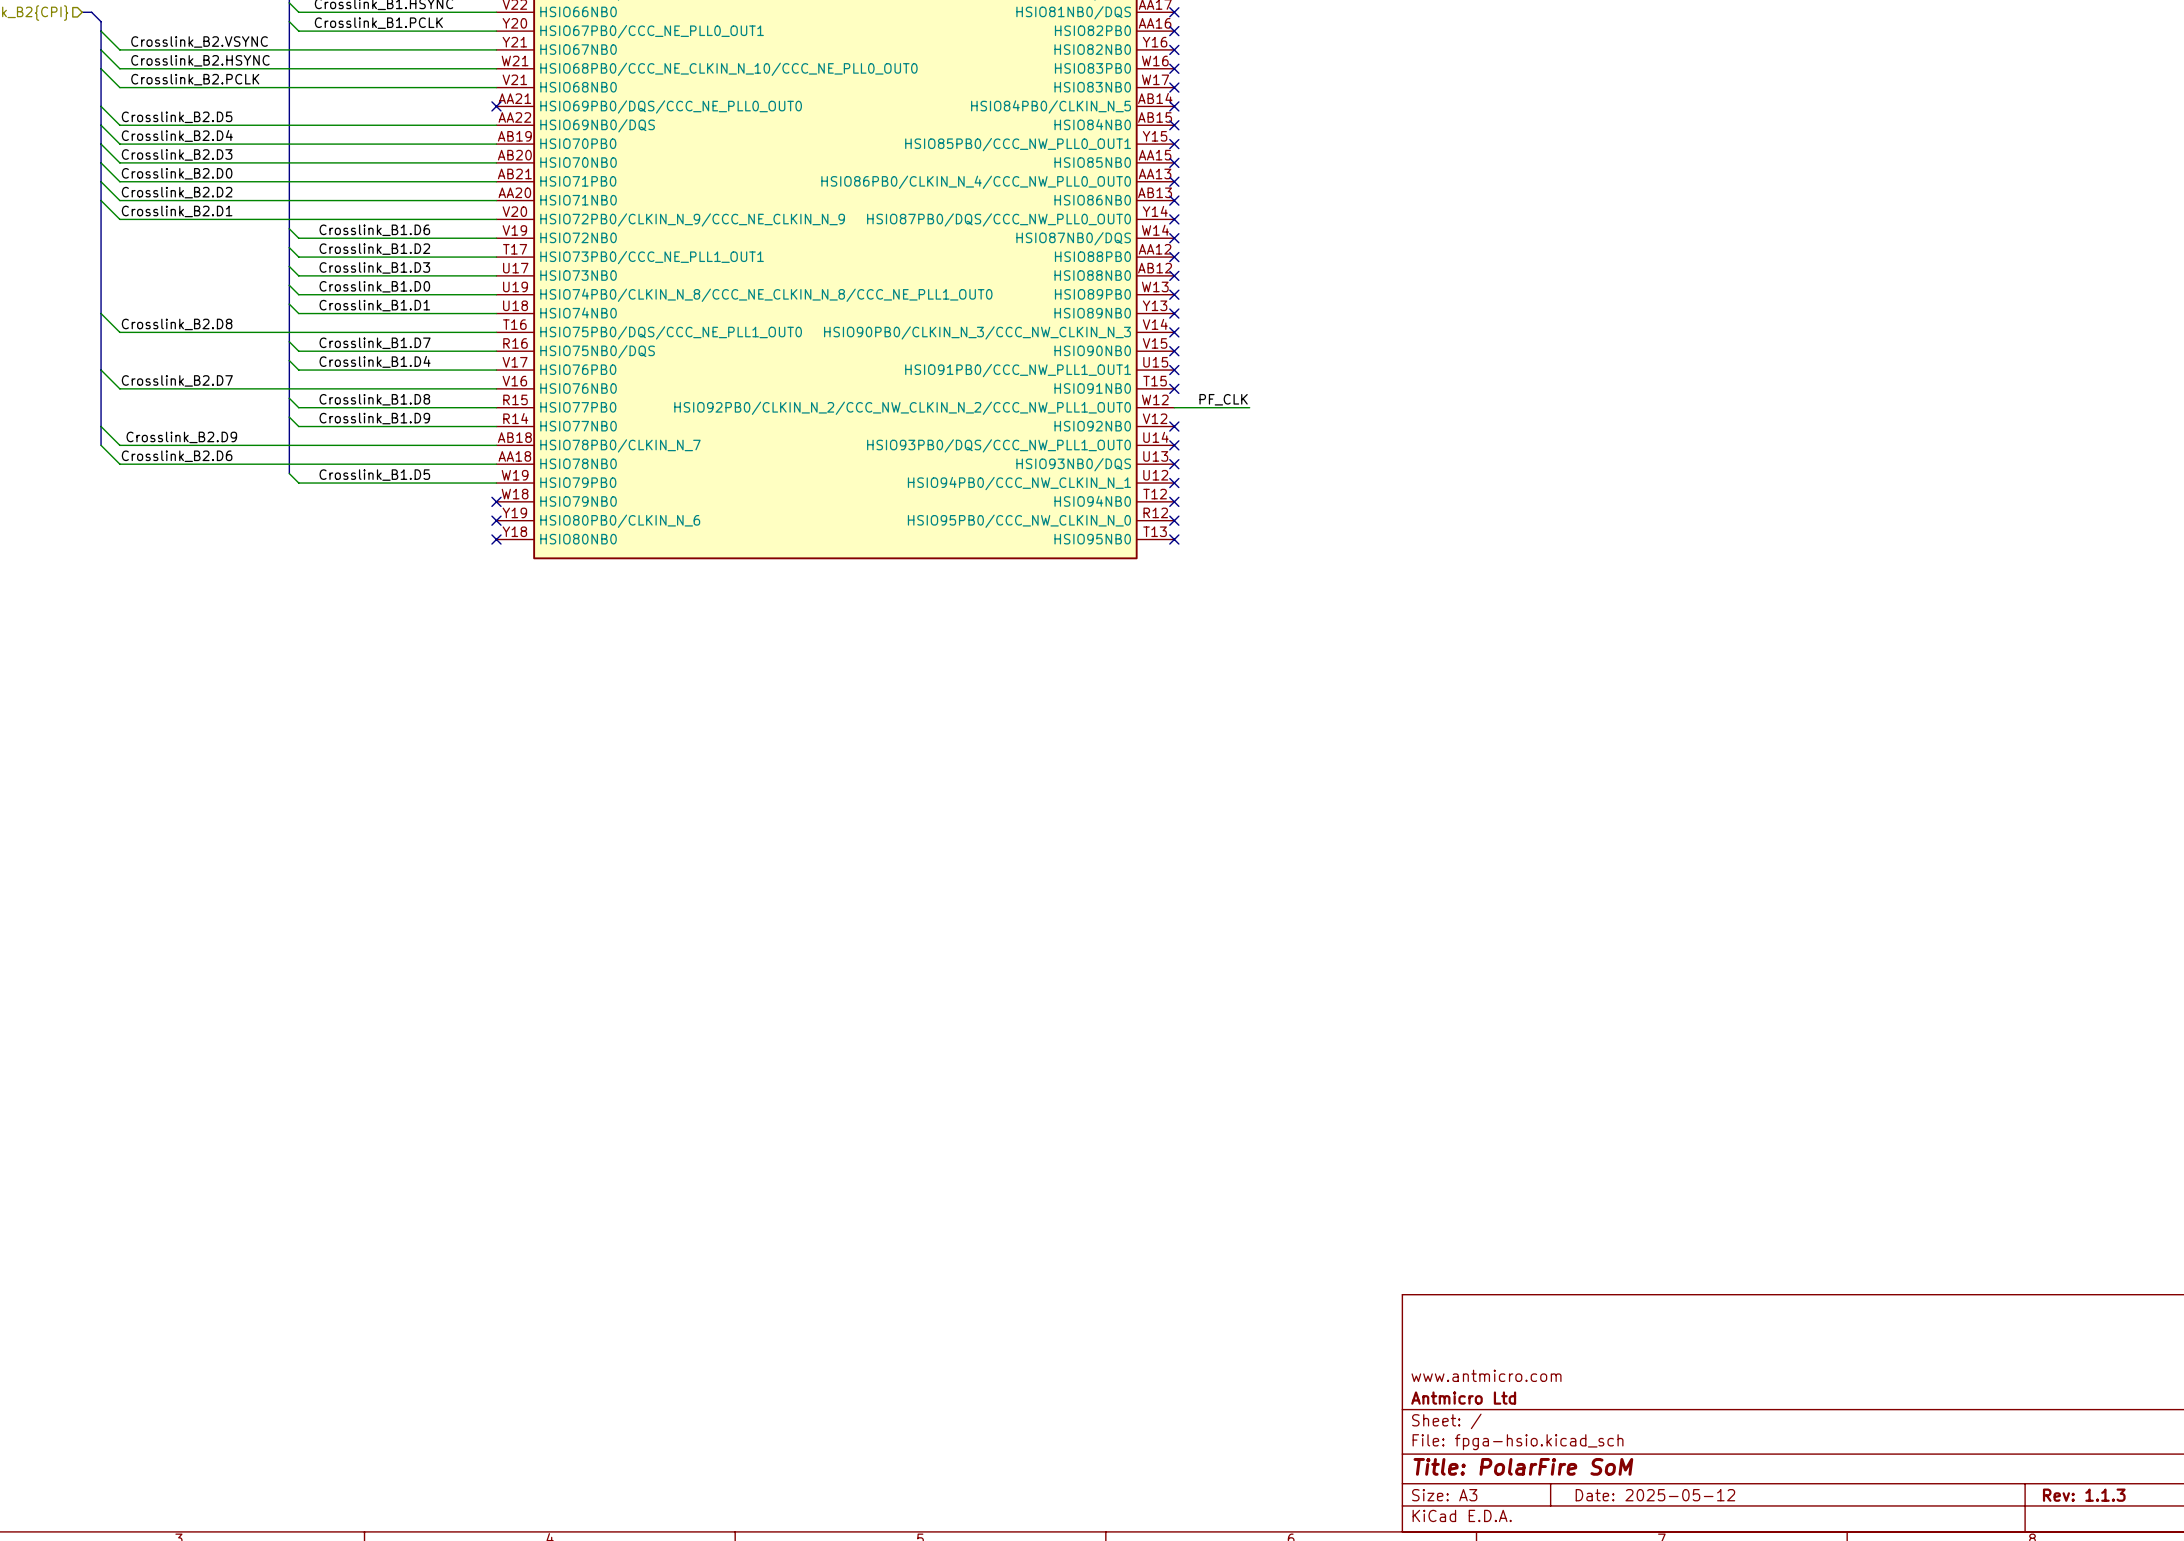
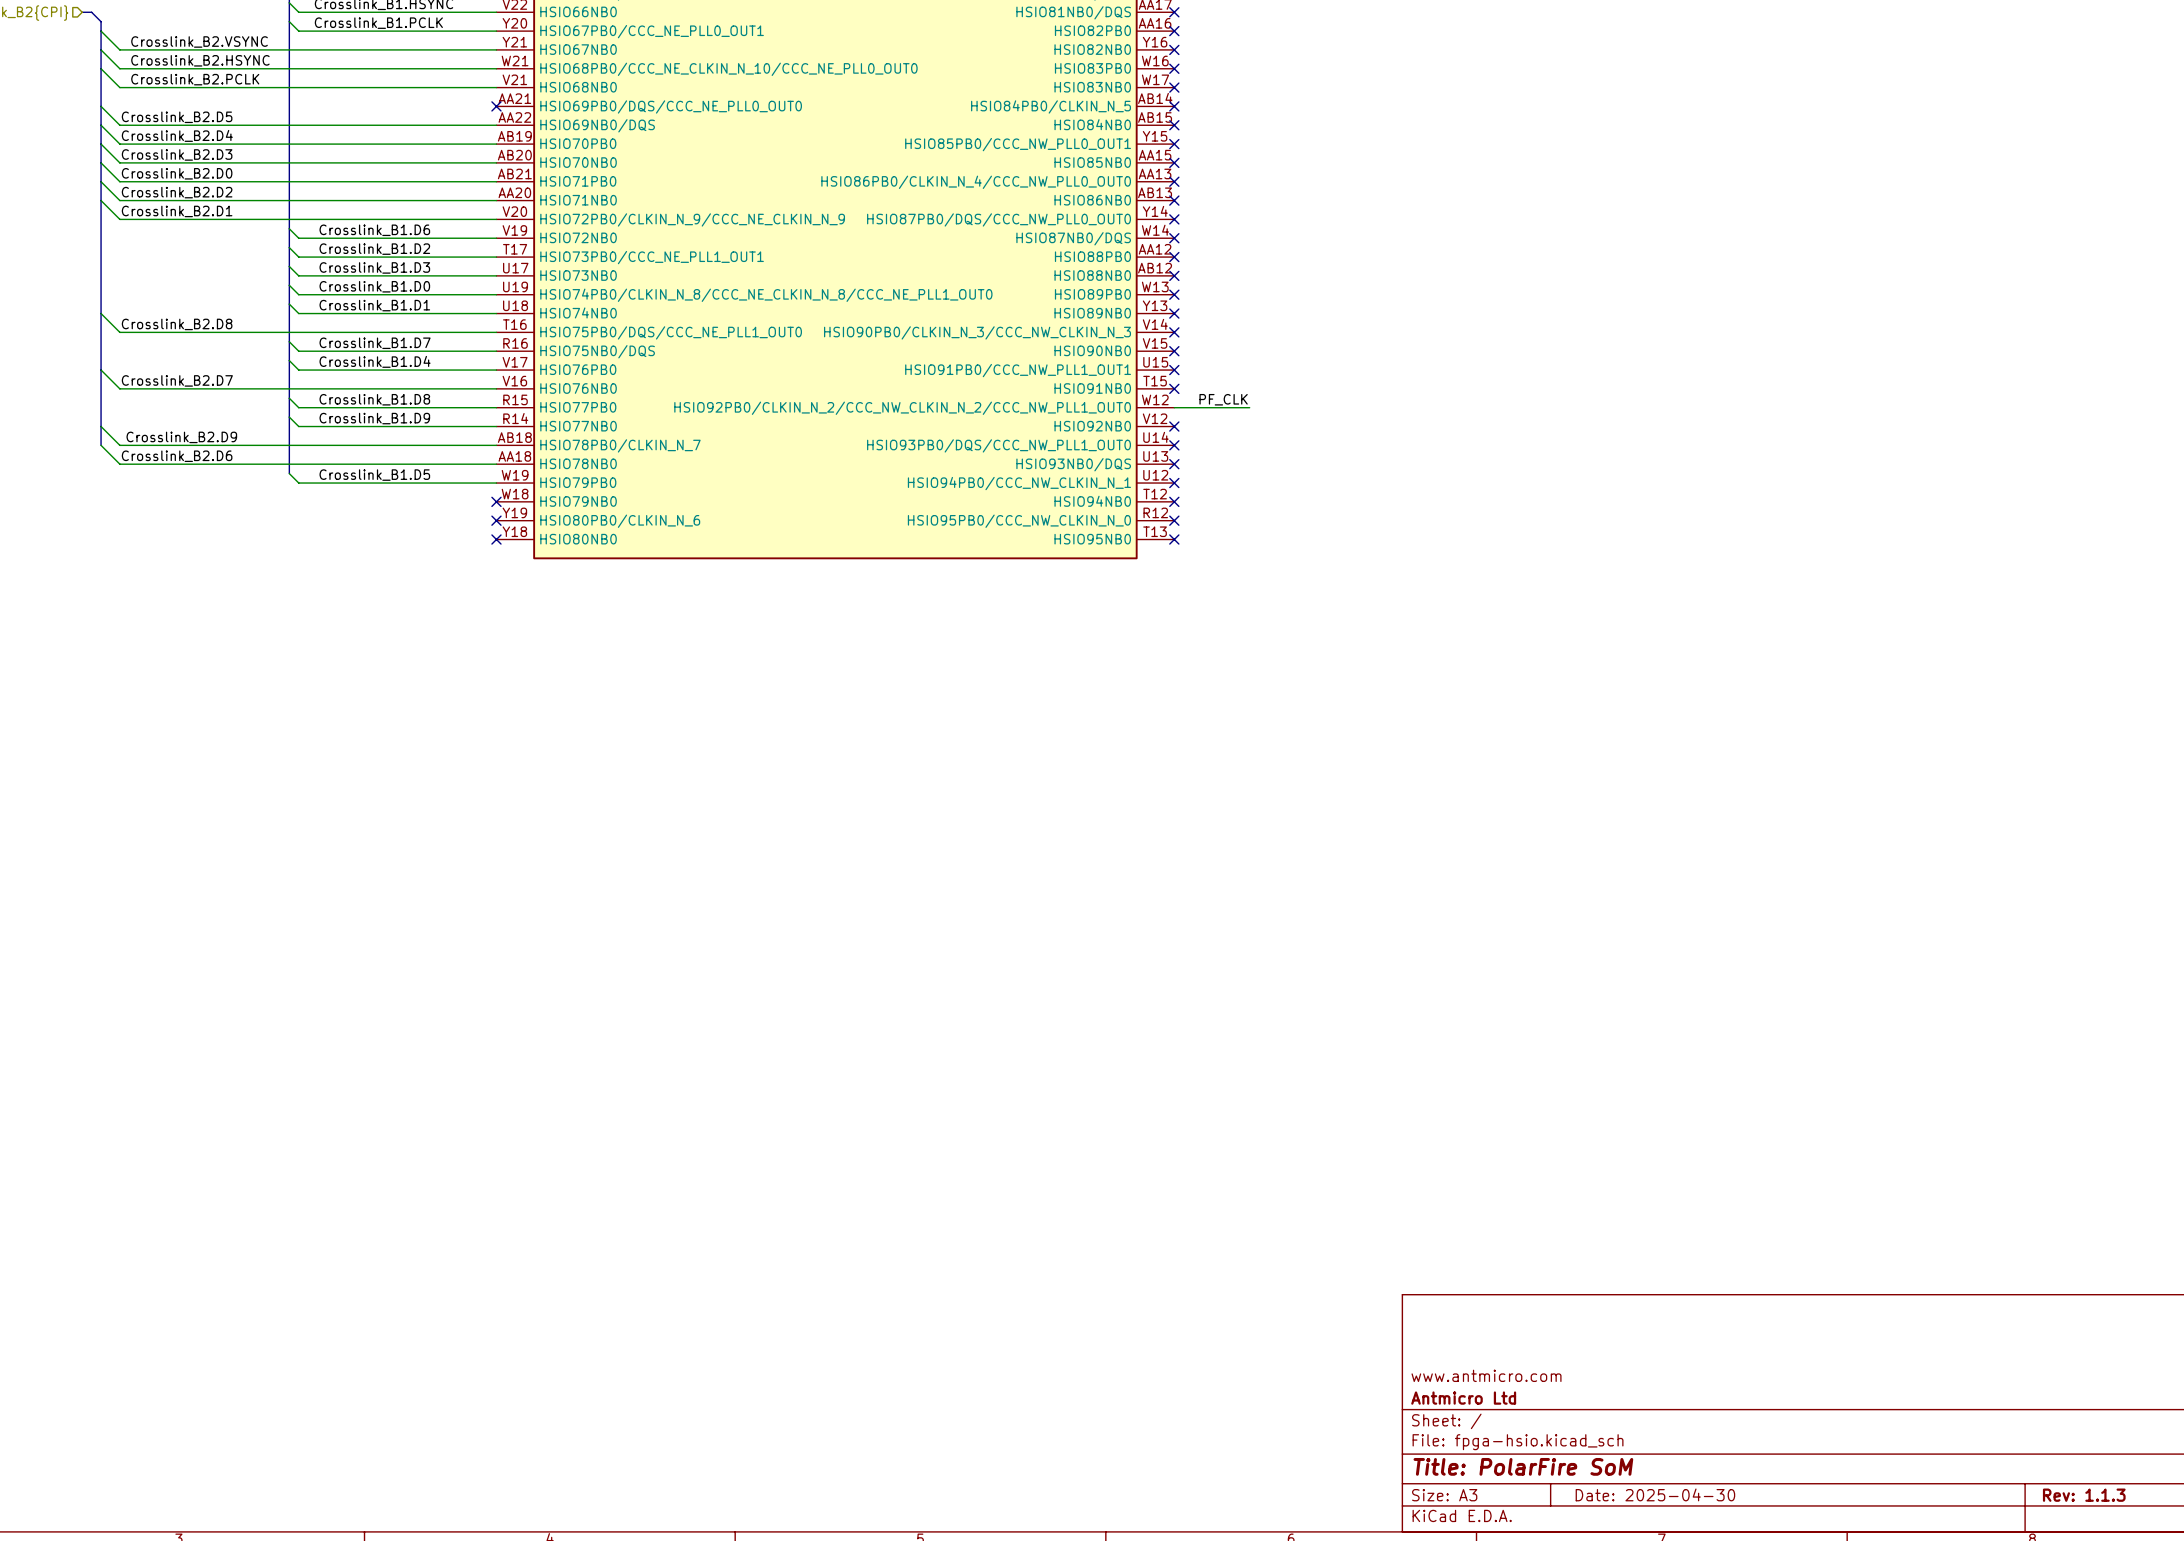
title block: Date: 2025-05-12 (1655, 1495) -> Date: 2025-04-30 (1655, 1494)

